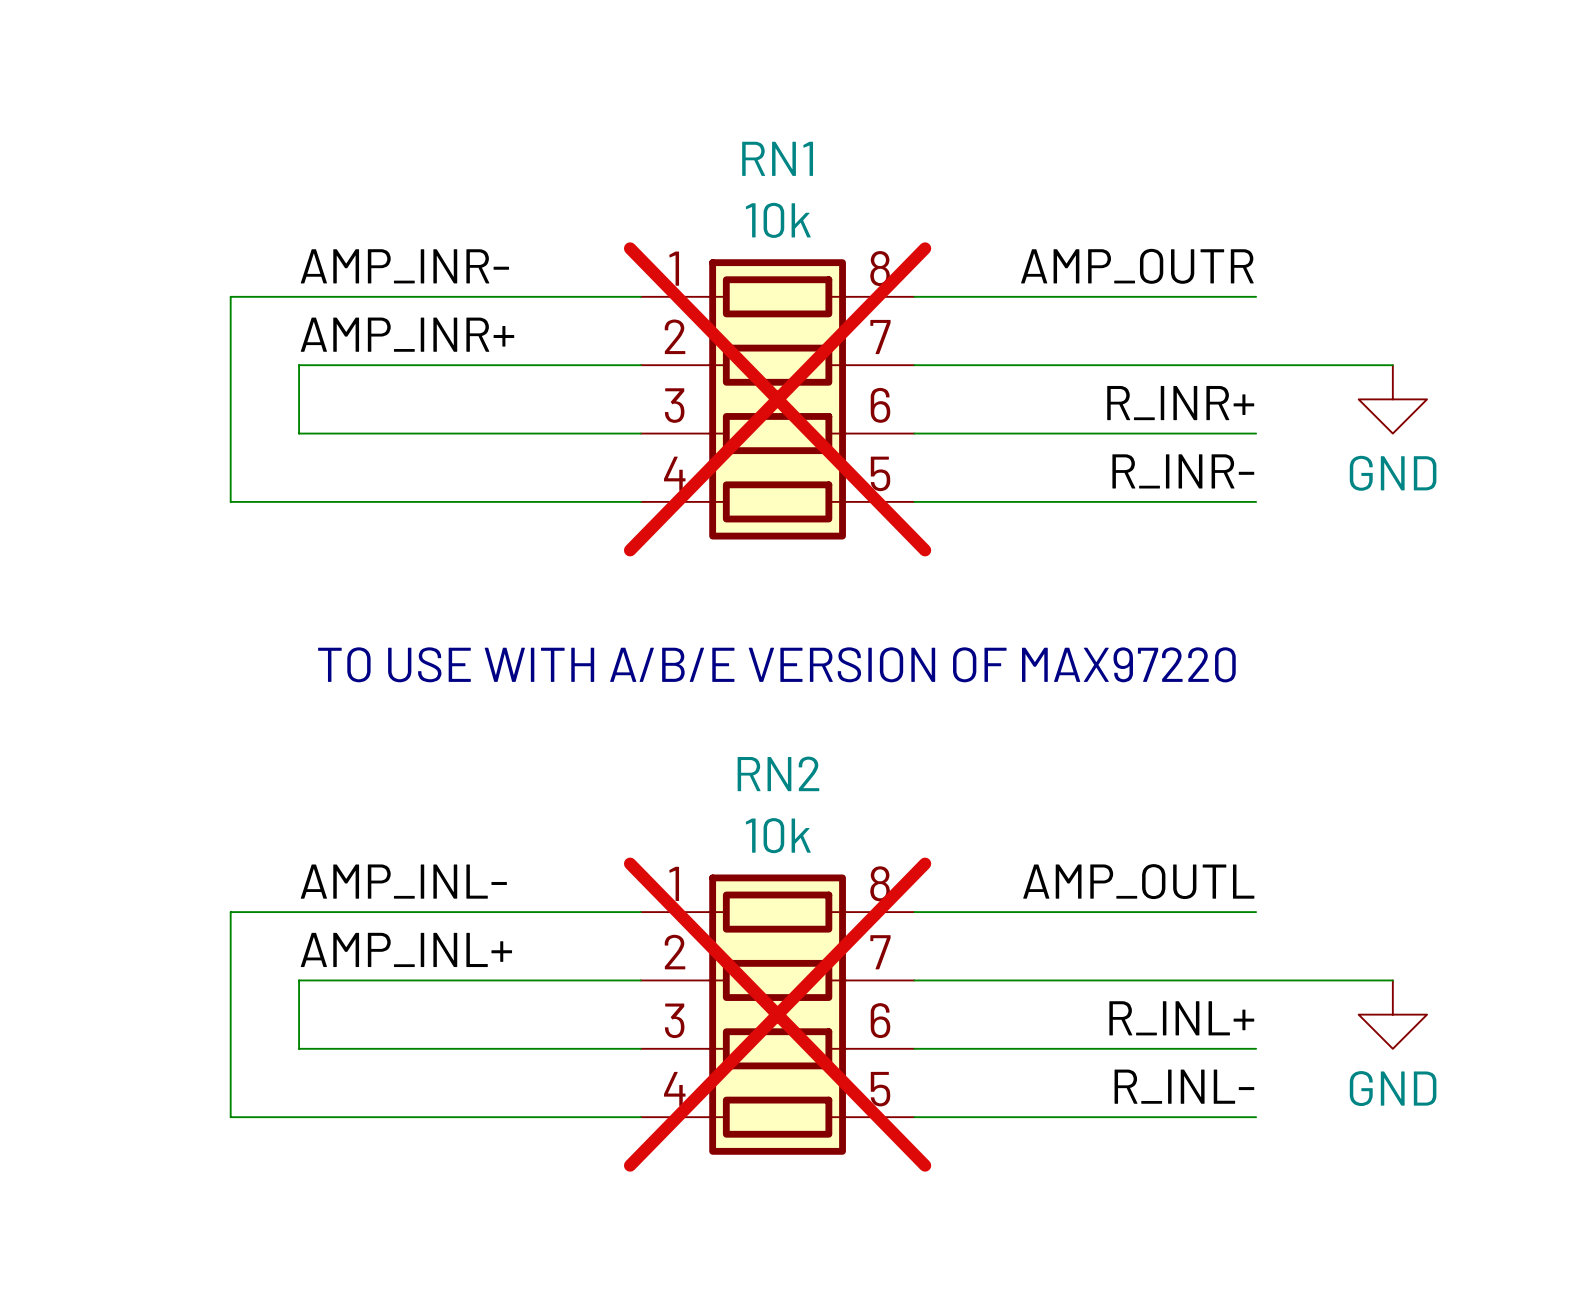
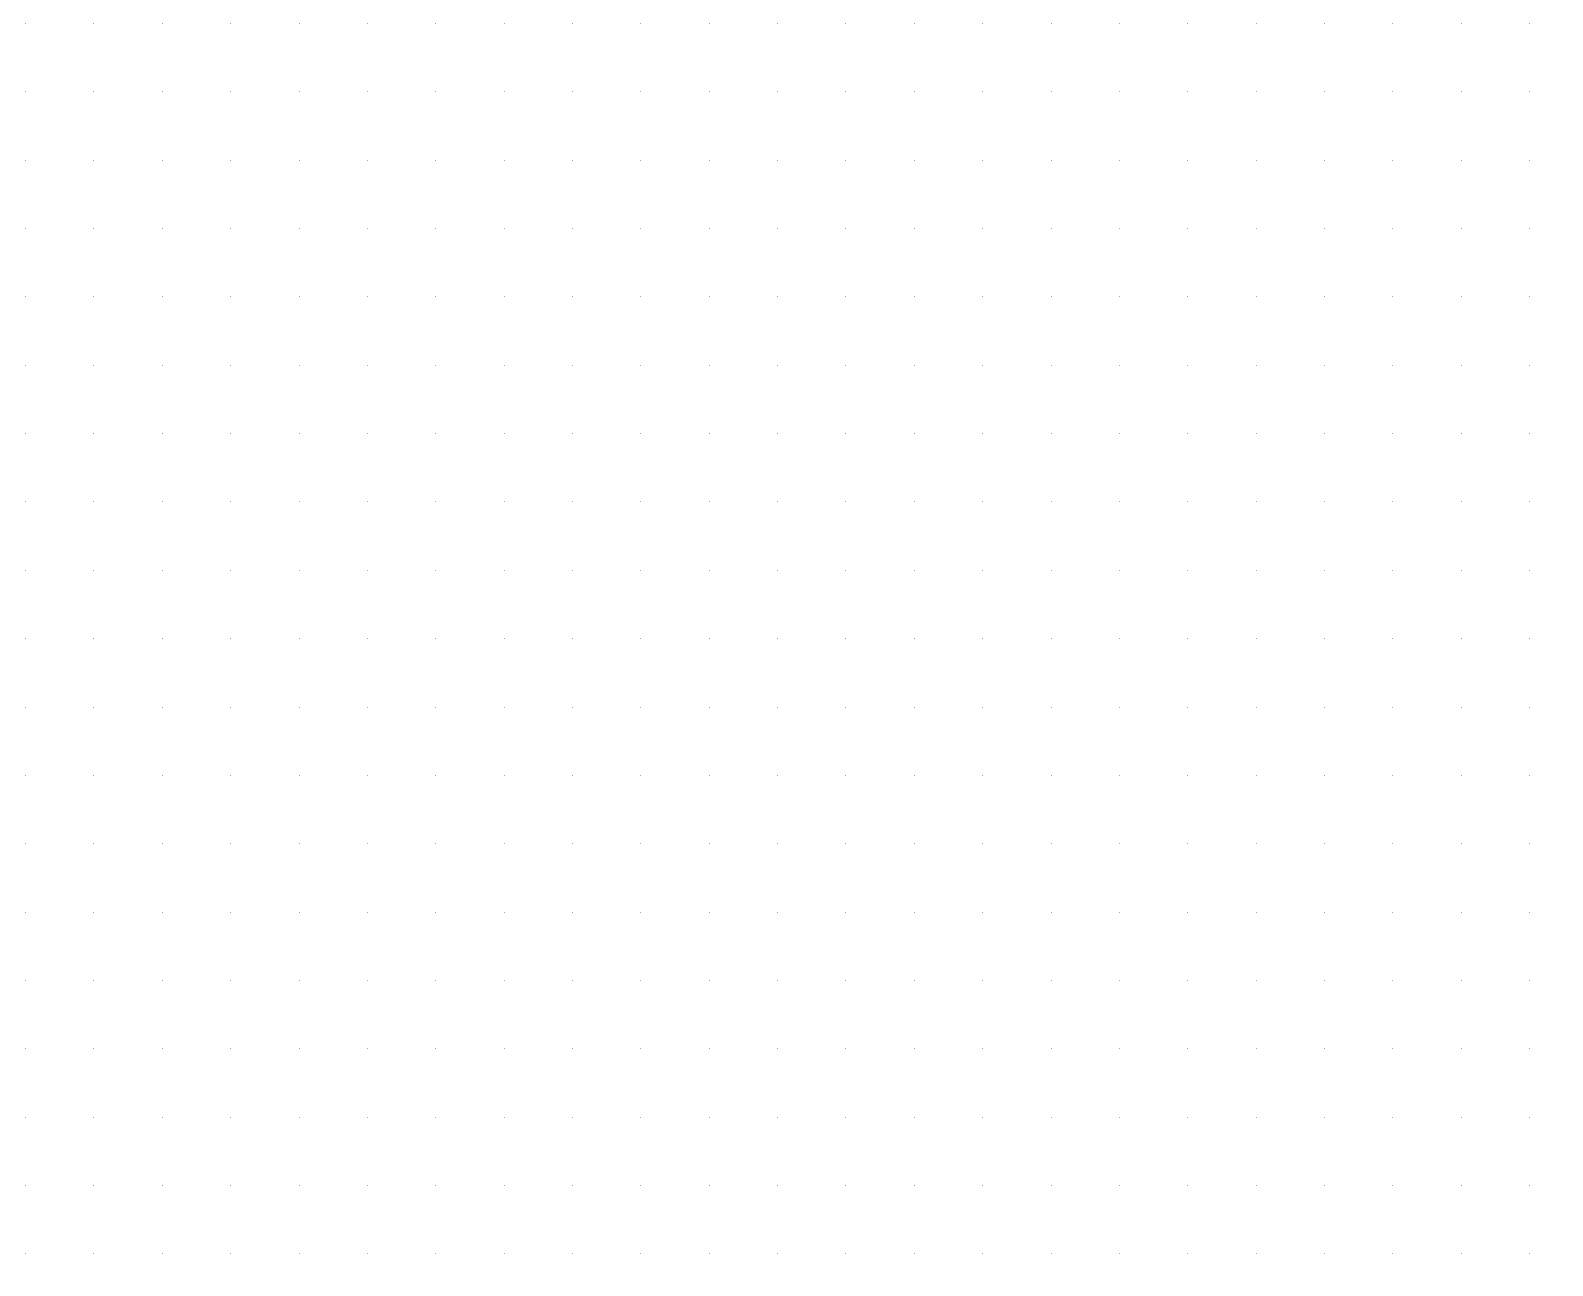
label: AMP_INR- (404, 266) -> none
label: AMP_OUTR (1137, 266) -> none
wire: (640, 296) (230, 296) (230, 501) (640, 501) -> none
wire: (914, 296) (1256, 296) -> none
label: AMP_INR+ (407, 334) -> none
wire: (640, 365) (299, 365) (299, 433) (640, 433) -> none
wire: (914, 365) (1392, 365) -> none
RN1: 10k (777, 399) -> none
power symbol: GND (1392, 399) -> none
label: R_INR+ (1180, 403) -> none
wire: (914, 433) (1256, 433) -> none
label: R_INR- (1183, 471) -> none
wire: (914, 501) (1256, 501) -> none
text: TO USE WITH A/B/E VERSION OF MAX97220 (776, 664) -> none
label: AMP_INL- (403, 881) -> none
label: AMP_OUTL (1138, 881) -> none
wire: (640, 912) (230, 912) (230, 1117) (640, 1117) -> none
wire: (914, 912) (1256, 912) -> none
label: AMP_INL+ (406, 949) -> none
wire: (640, 980) (299, 980) (299, 1048) (640, 1048) -> none
wire: (914, 980) (1392, 980) -> none
RN2: 10k (777, 1014) -> none
power symbol: GND (1392, 1014) -> none
label: R_INL+ (1181, 1018) -> none
wire: (914, 1048) (1256, 1048) -> none
label: R_INL- (1184, 1086) -> none
wire: (914, 1117) (1256, 1117) -> none

